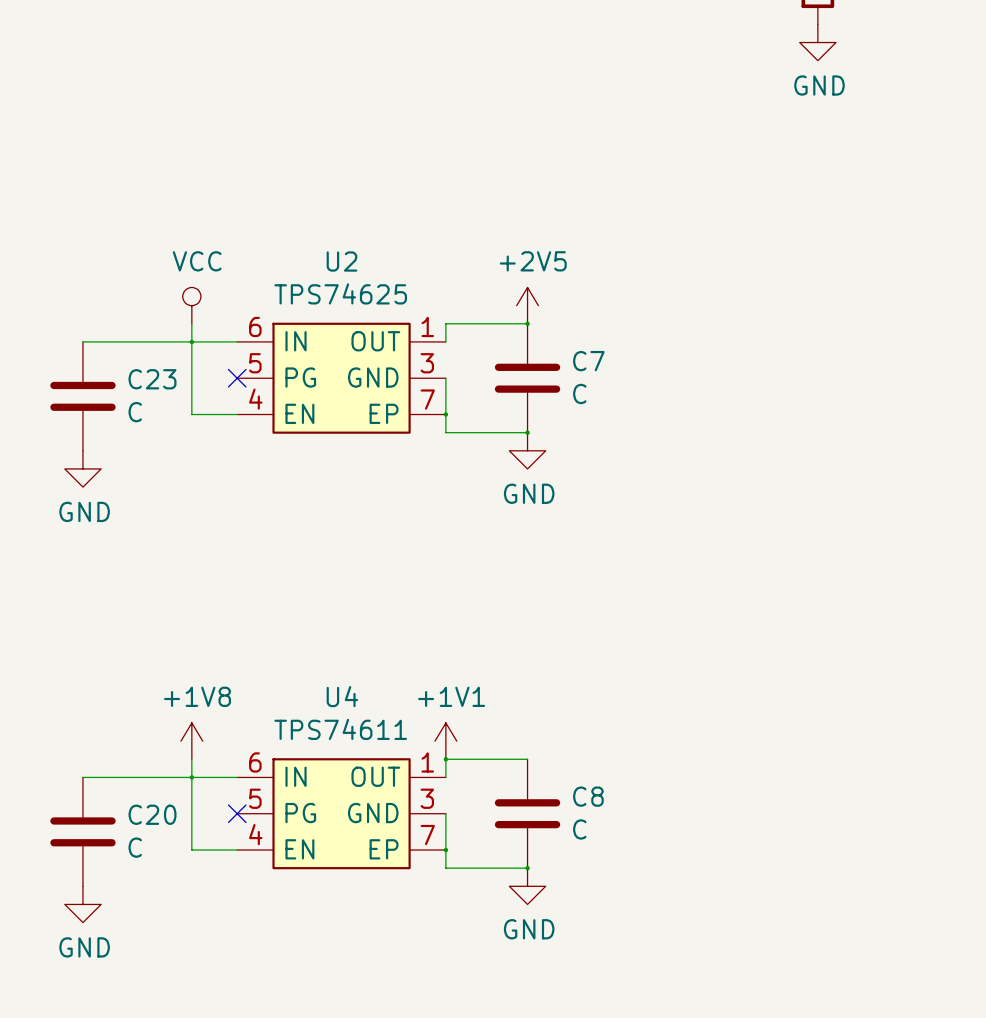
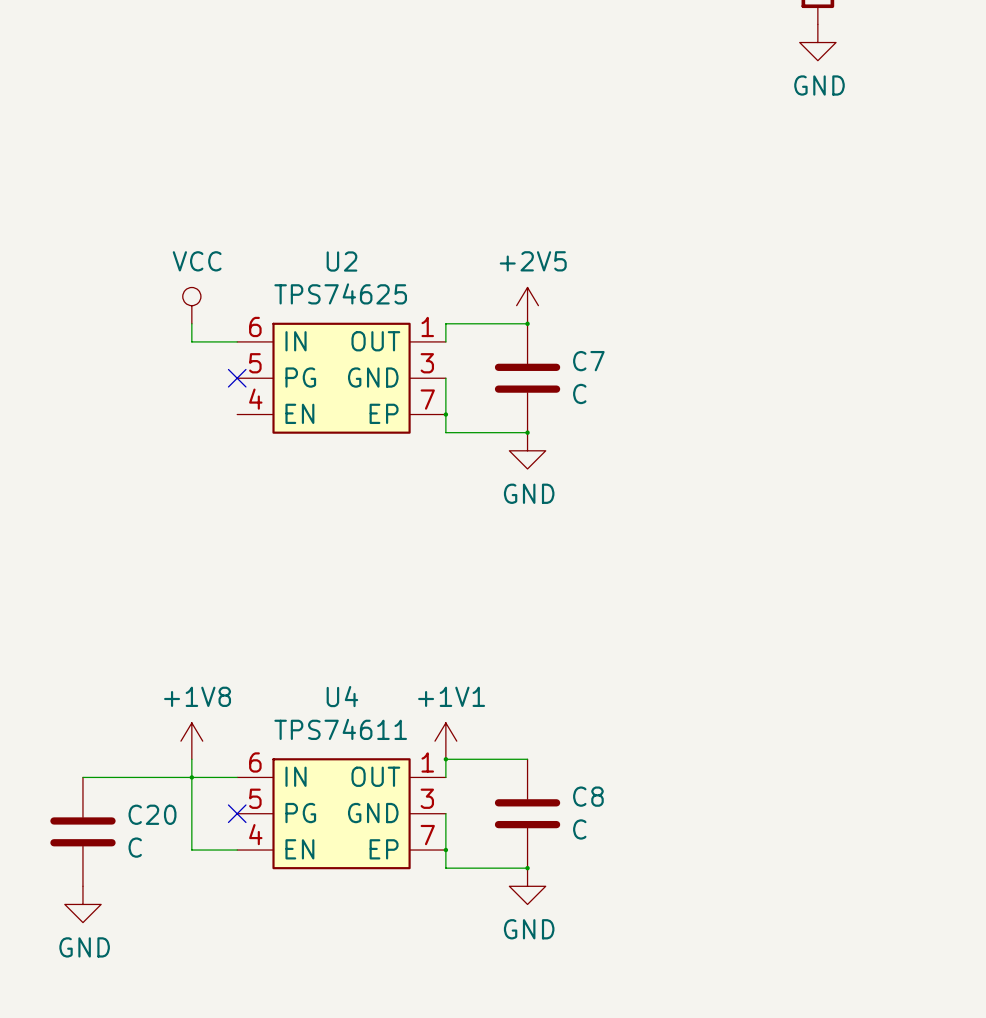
wire: (82, 341) (191, 341) (191, 414) (237, 414) -> none
junction: (191, 341) -> none
C23: C (82, 396) -> none
power symbol: GND (82, 468) -> none

